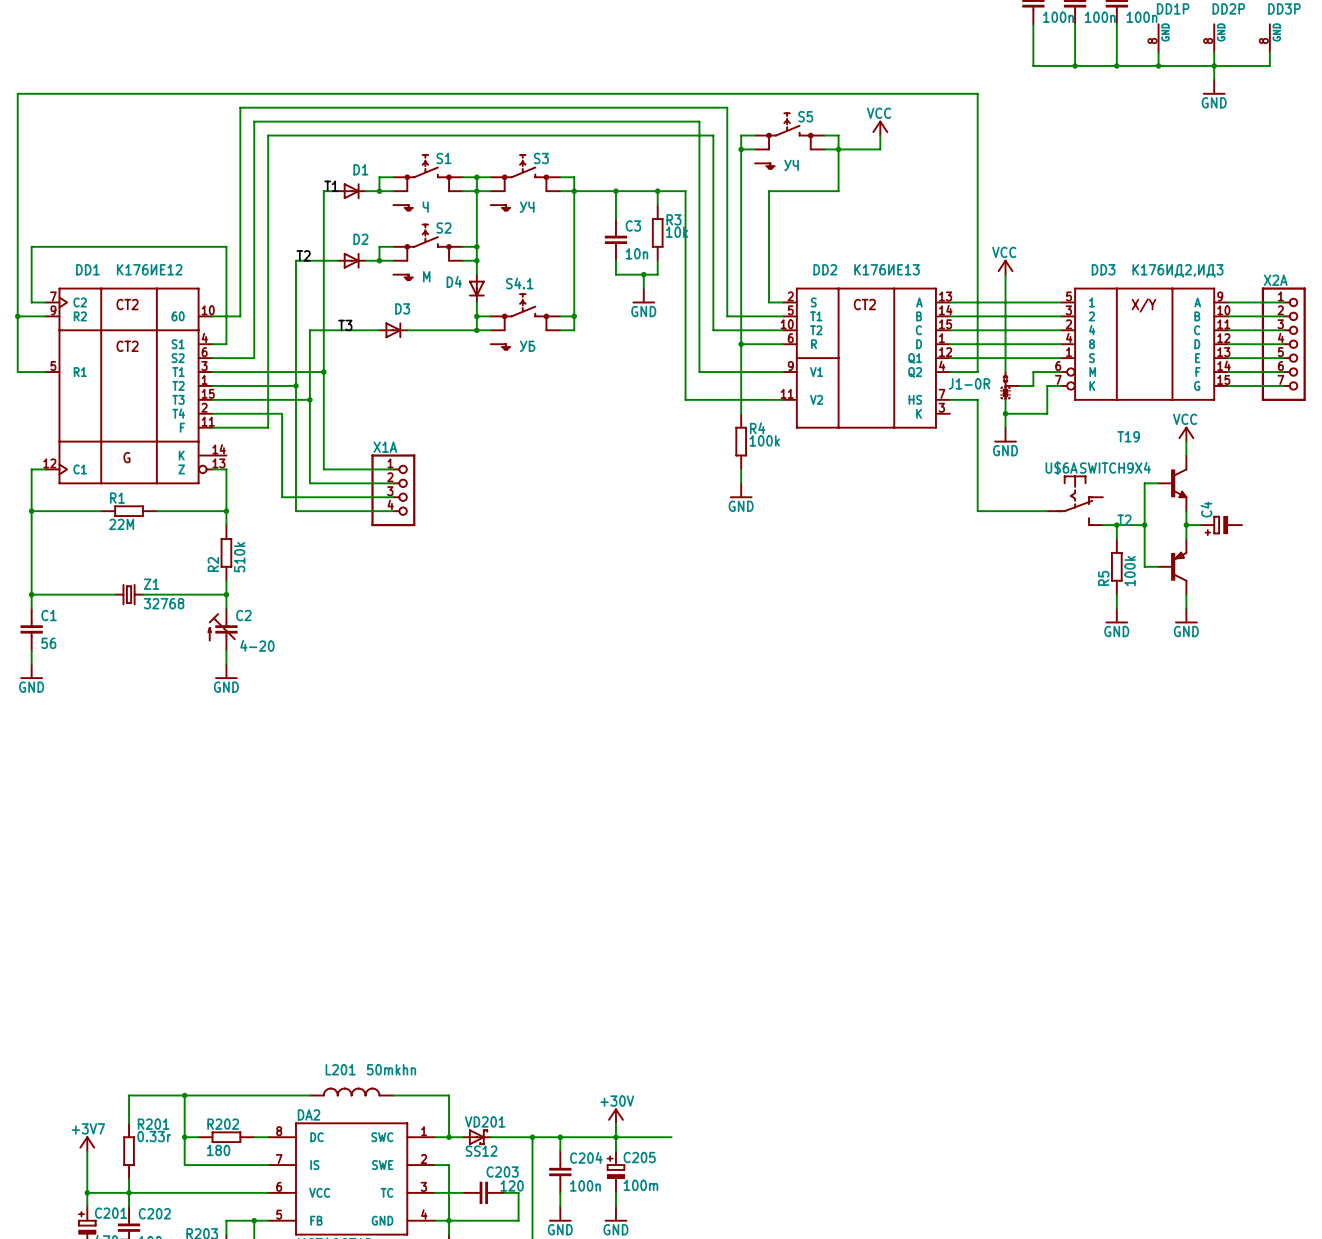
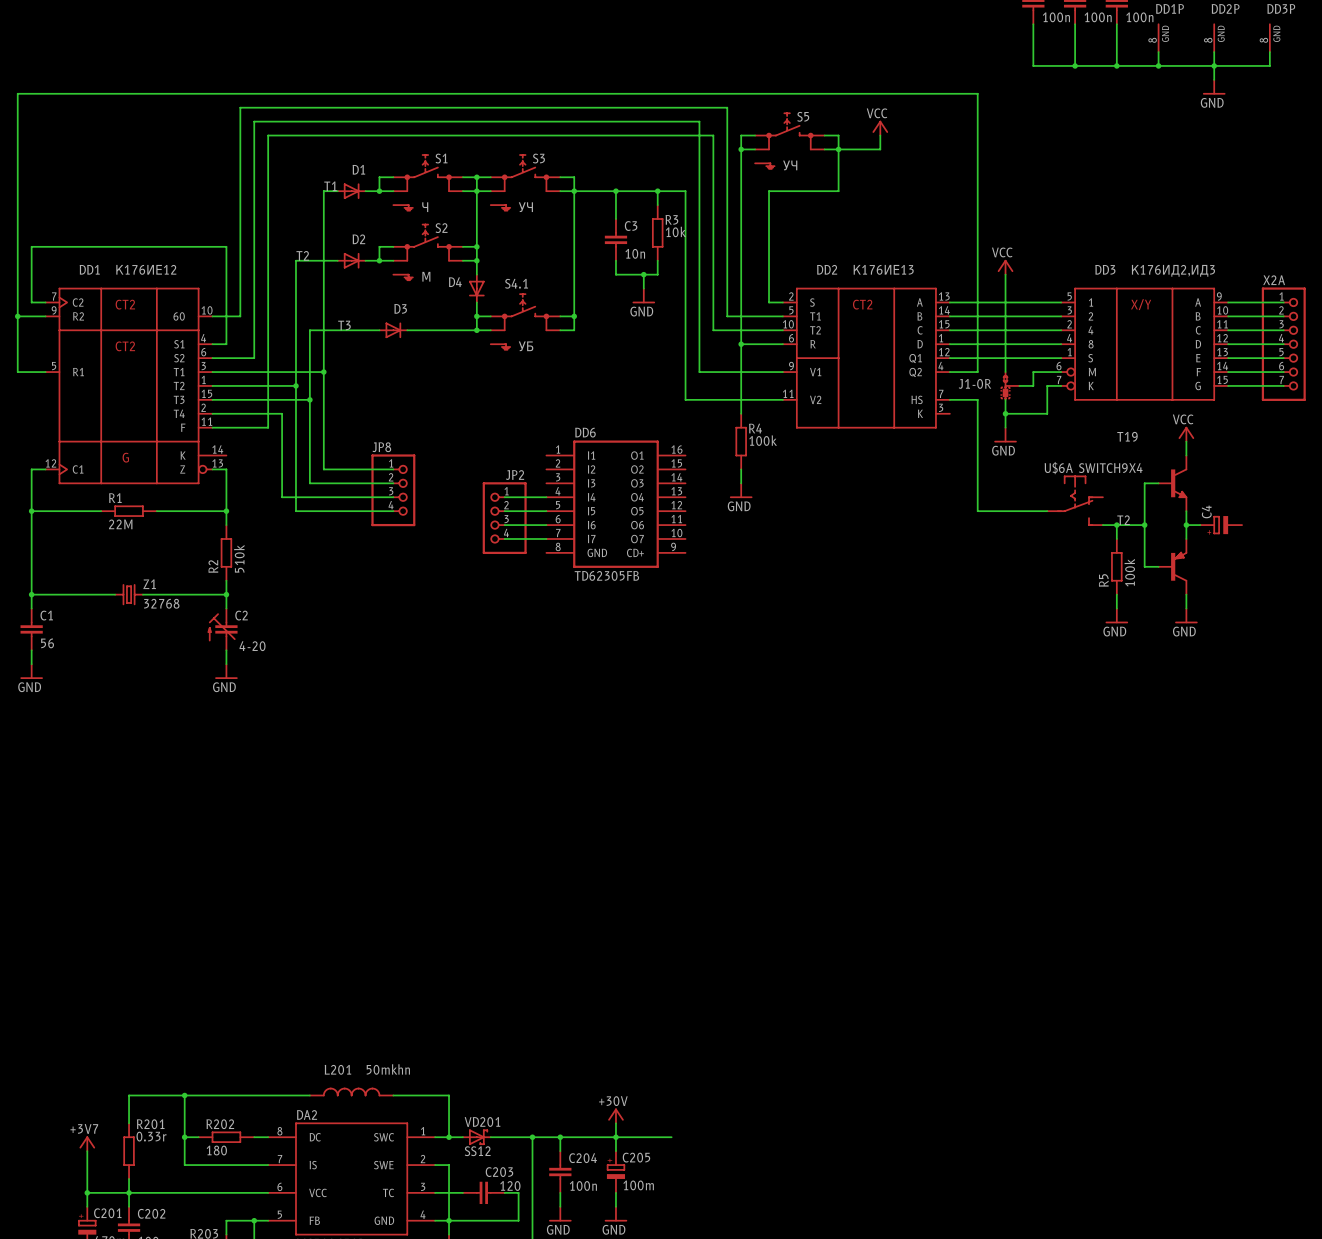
X1A name: X1A (385, 447) -> JP8 (381, 447)
wire: none -> (504, 497) (546, 497)
DD6: none -> TD62305FB (615, 504)
wire: none -> (504, 511) (546, 511)
JP2: none -> (504, 518)
wire: none -> (504, 525) (546, 525)
wire: none -> (504, 538) (546, 538)

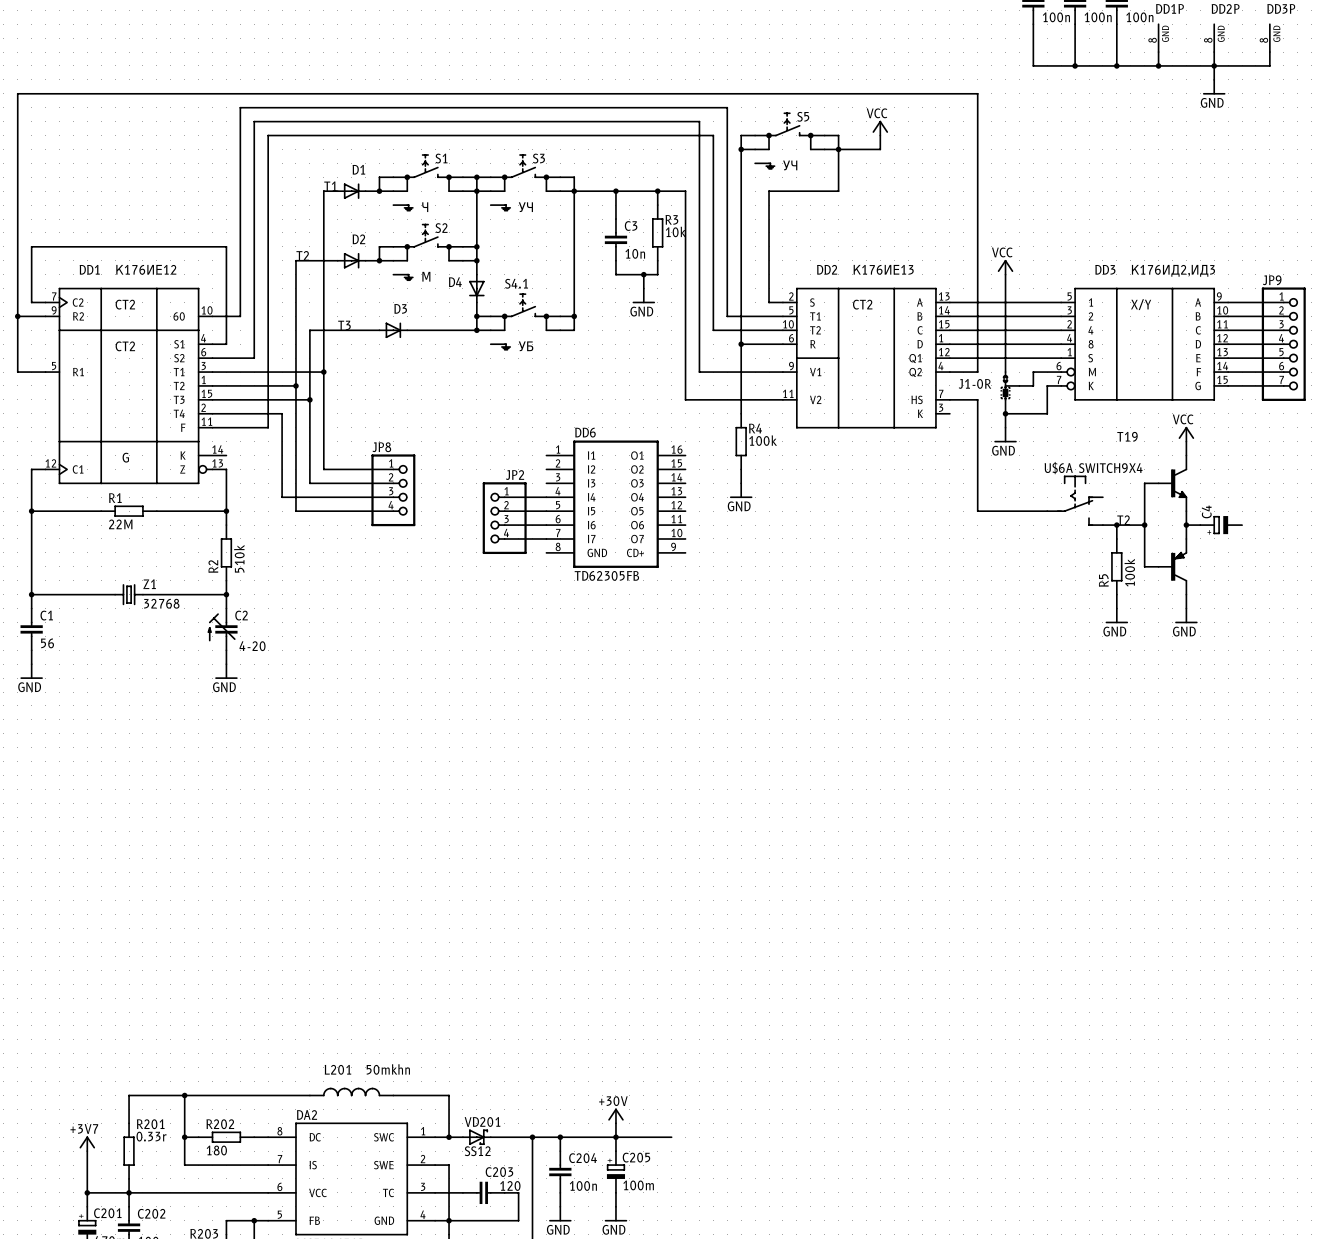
X2A name: X2A (1274, 280) -> JP9 (1272, 280)

